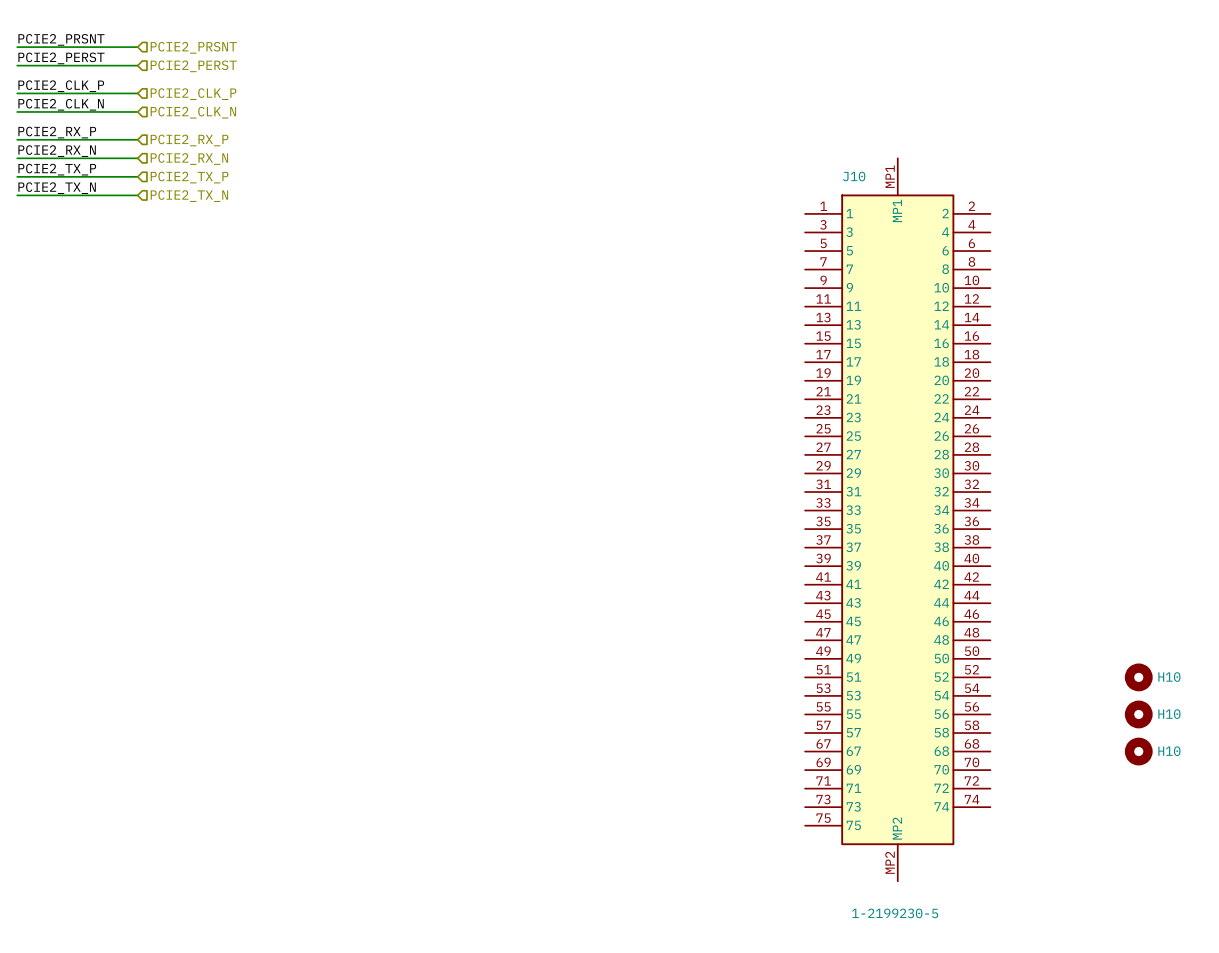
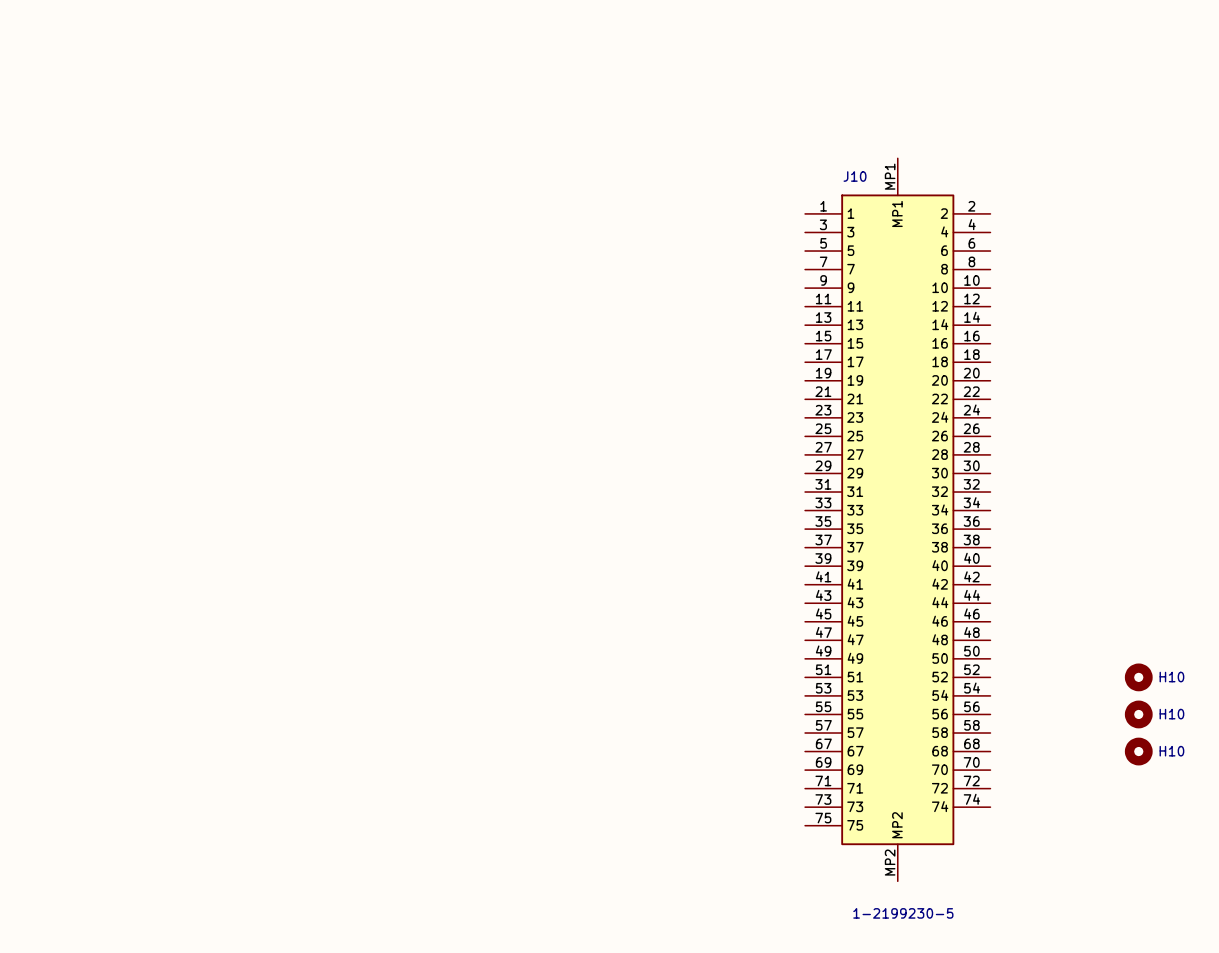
label: PCIE2_PRSNT (61, 39) -> none
wire: (17, 47) (137, 47) -> none
hierarchical label: PCIE2_PRSNT (193, 47) -> none
label: PCIE2_PERST (61, 58) -> none
wire: (17, 65) (137, 65) -> none
hierarchical label: PCIE2_PERST (193, 66) -> none
label: PCIE2_CLK_P (61, 86) -> none
wire: (17, 93) (137, 93) -> none
hierarchical label: PCIE2_CLK_P (193, 94) -> none
label: PCIE2_CLK_N (61, 104) -> none
wire: (17, 111) (137, 111) -> none
hierarchical label: PCIE2_CLK_N (193, 112) -> none
label: PCIE2_RX_P (57, 132) -> none
wire: (17, 139) (137, 139) -> none
hierarchical label: PCIE2_RX_P (189, 140) -> none
label: PCIE2_RX_N (57, 151) -> none
wire: (17, 158) (137, 158) -> none
hierarchical label: PCIE2_RX_N (189, 159) -> none
label: PCIE2_TX_P (57, 169) -> none
wire: (17, 176) (137, 176) -> none
hierarchical label: PCIE2_TX_P (189, 177) -> none
label: PCIE2_TX_N (57, 188) -> none
wire: (17, 195) (137, 195) -> none
hierarchical label: PCIE2_TX_N (189, 196) -> none

